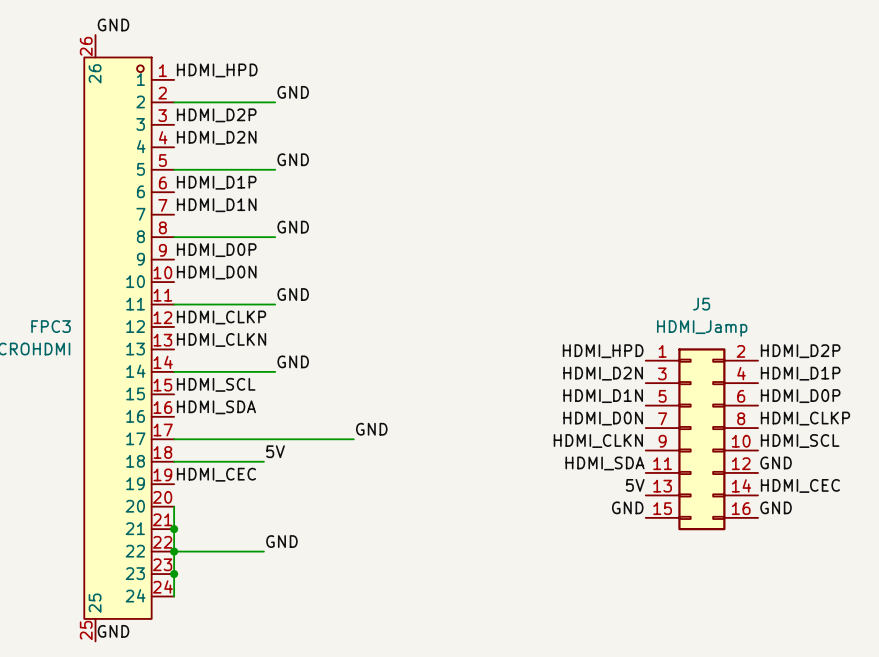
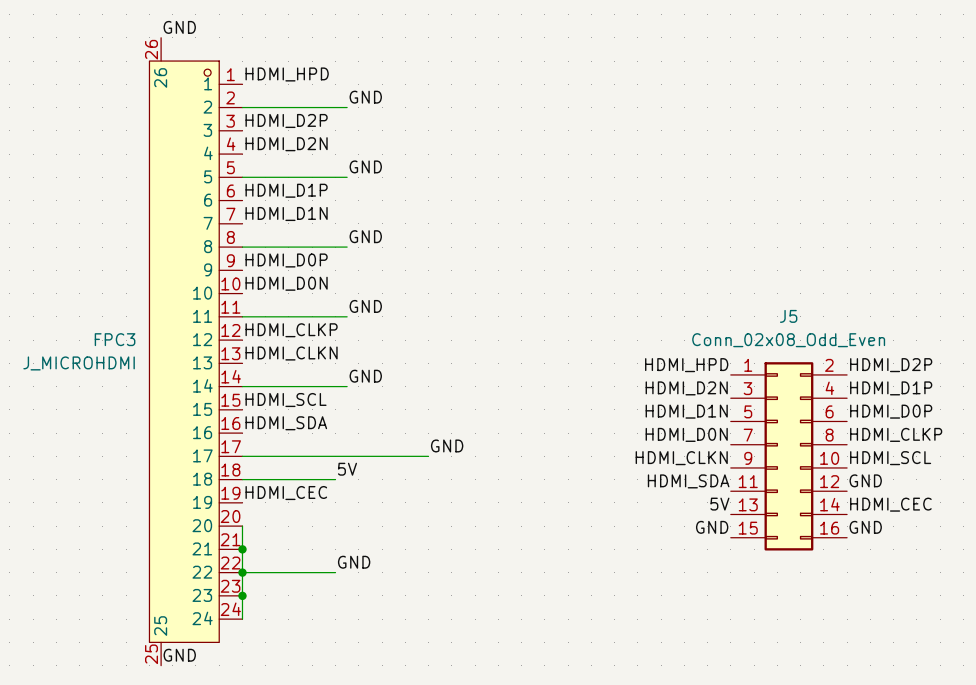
J5 value: HDMI_Jamp (702, 328) -> Conn_02x08_Odd_Even (788, 340)

